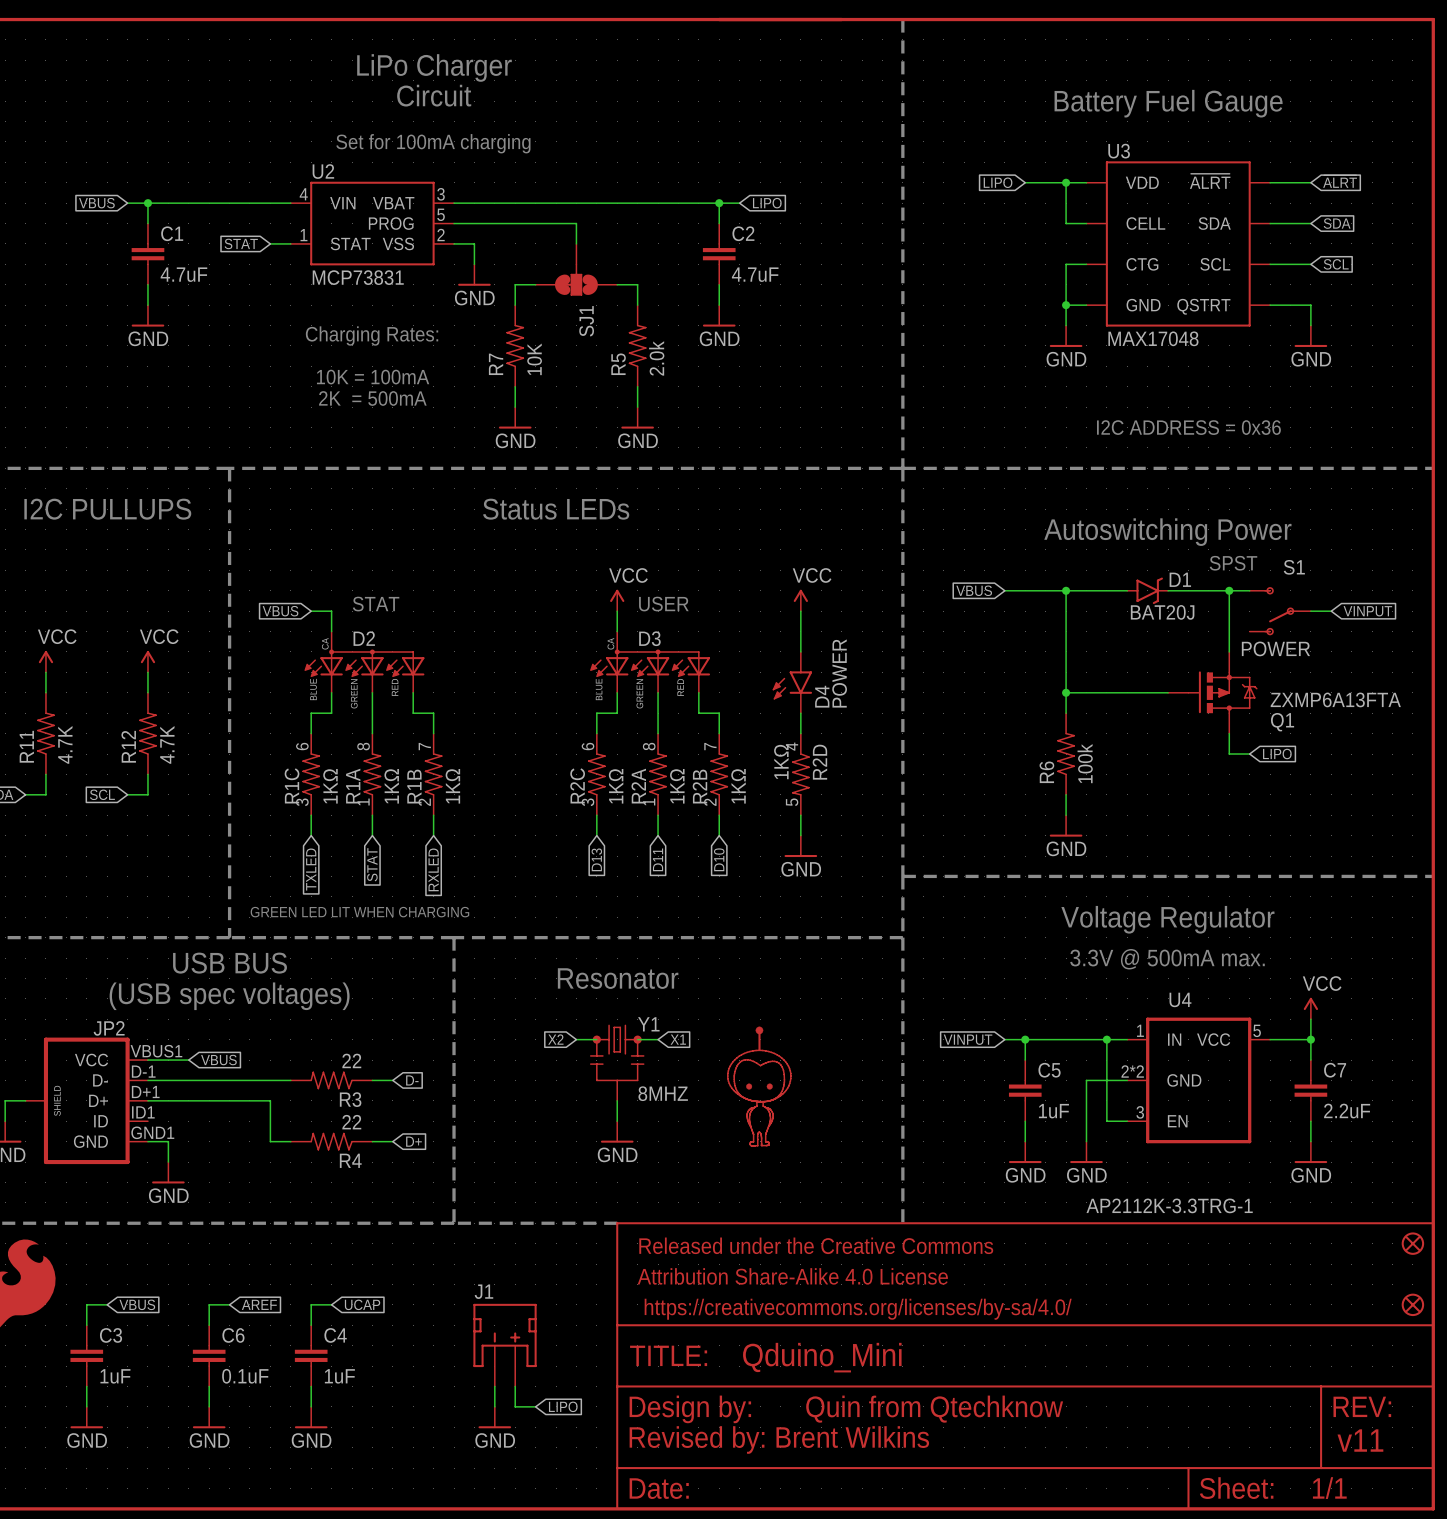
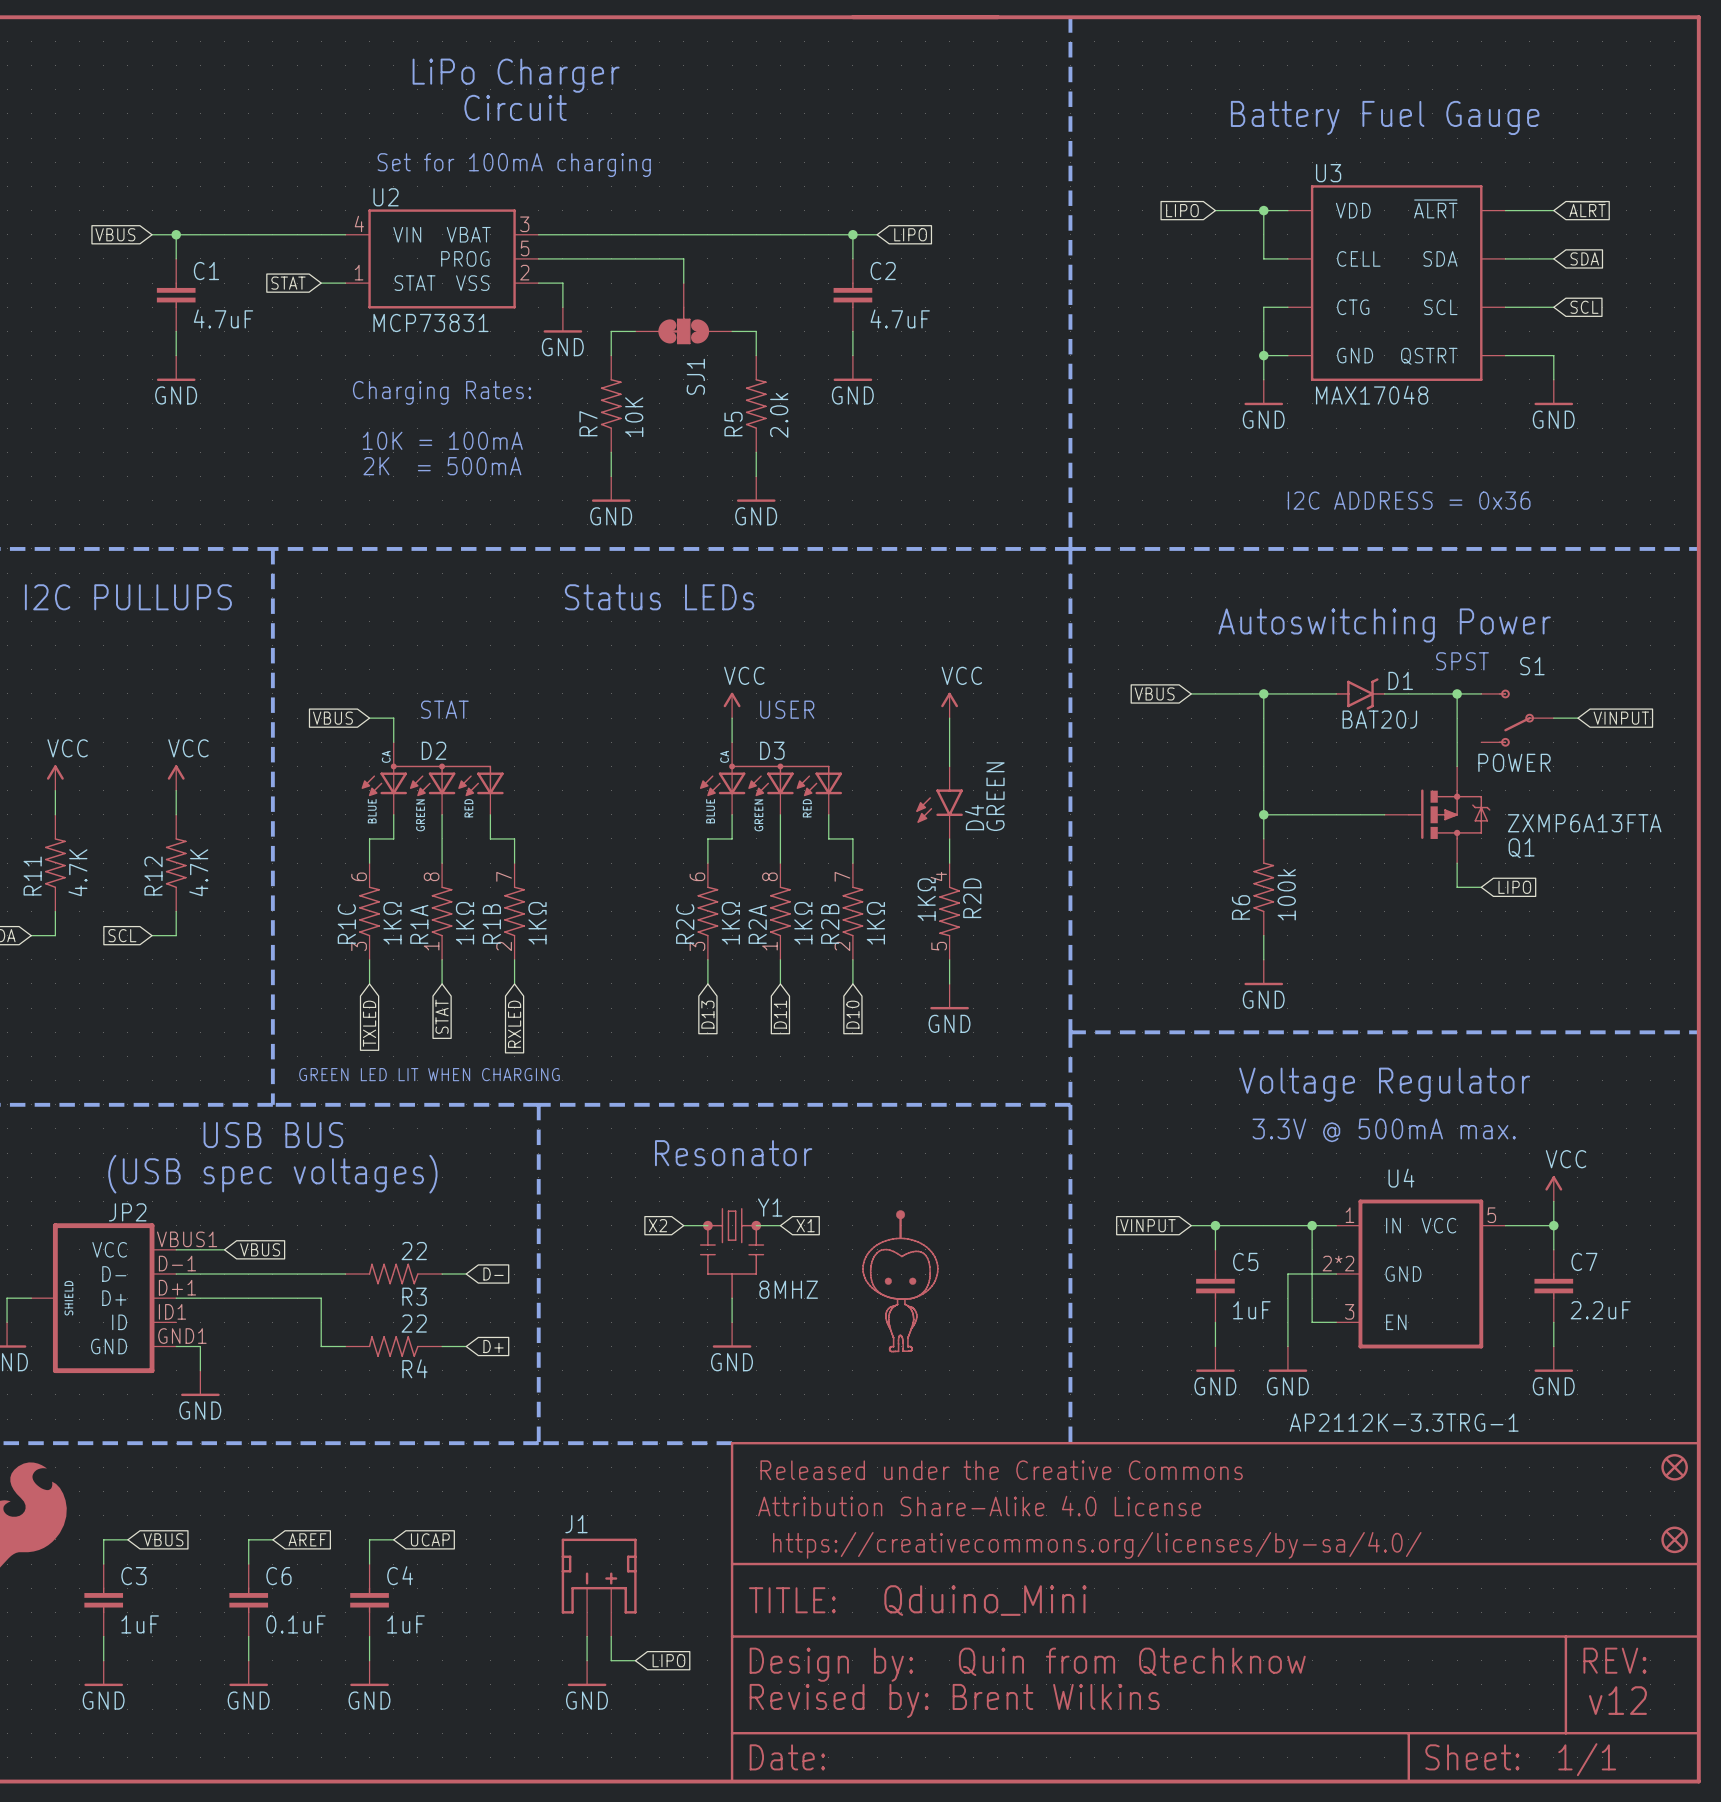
D4 value: POWER (839, 673) -> GREEN (995, 796)
text: v11 (1360, 1440) -> v12 (1617, 1700)

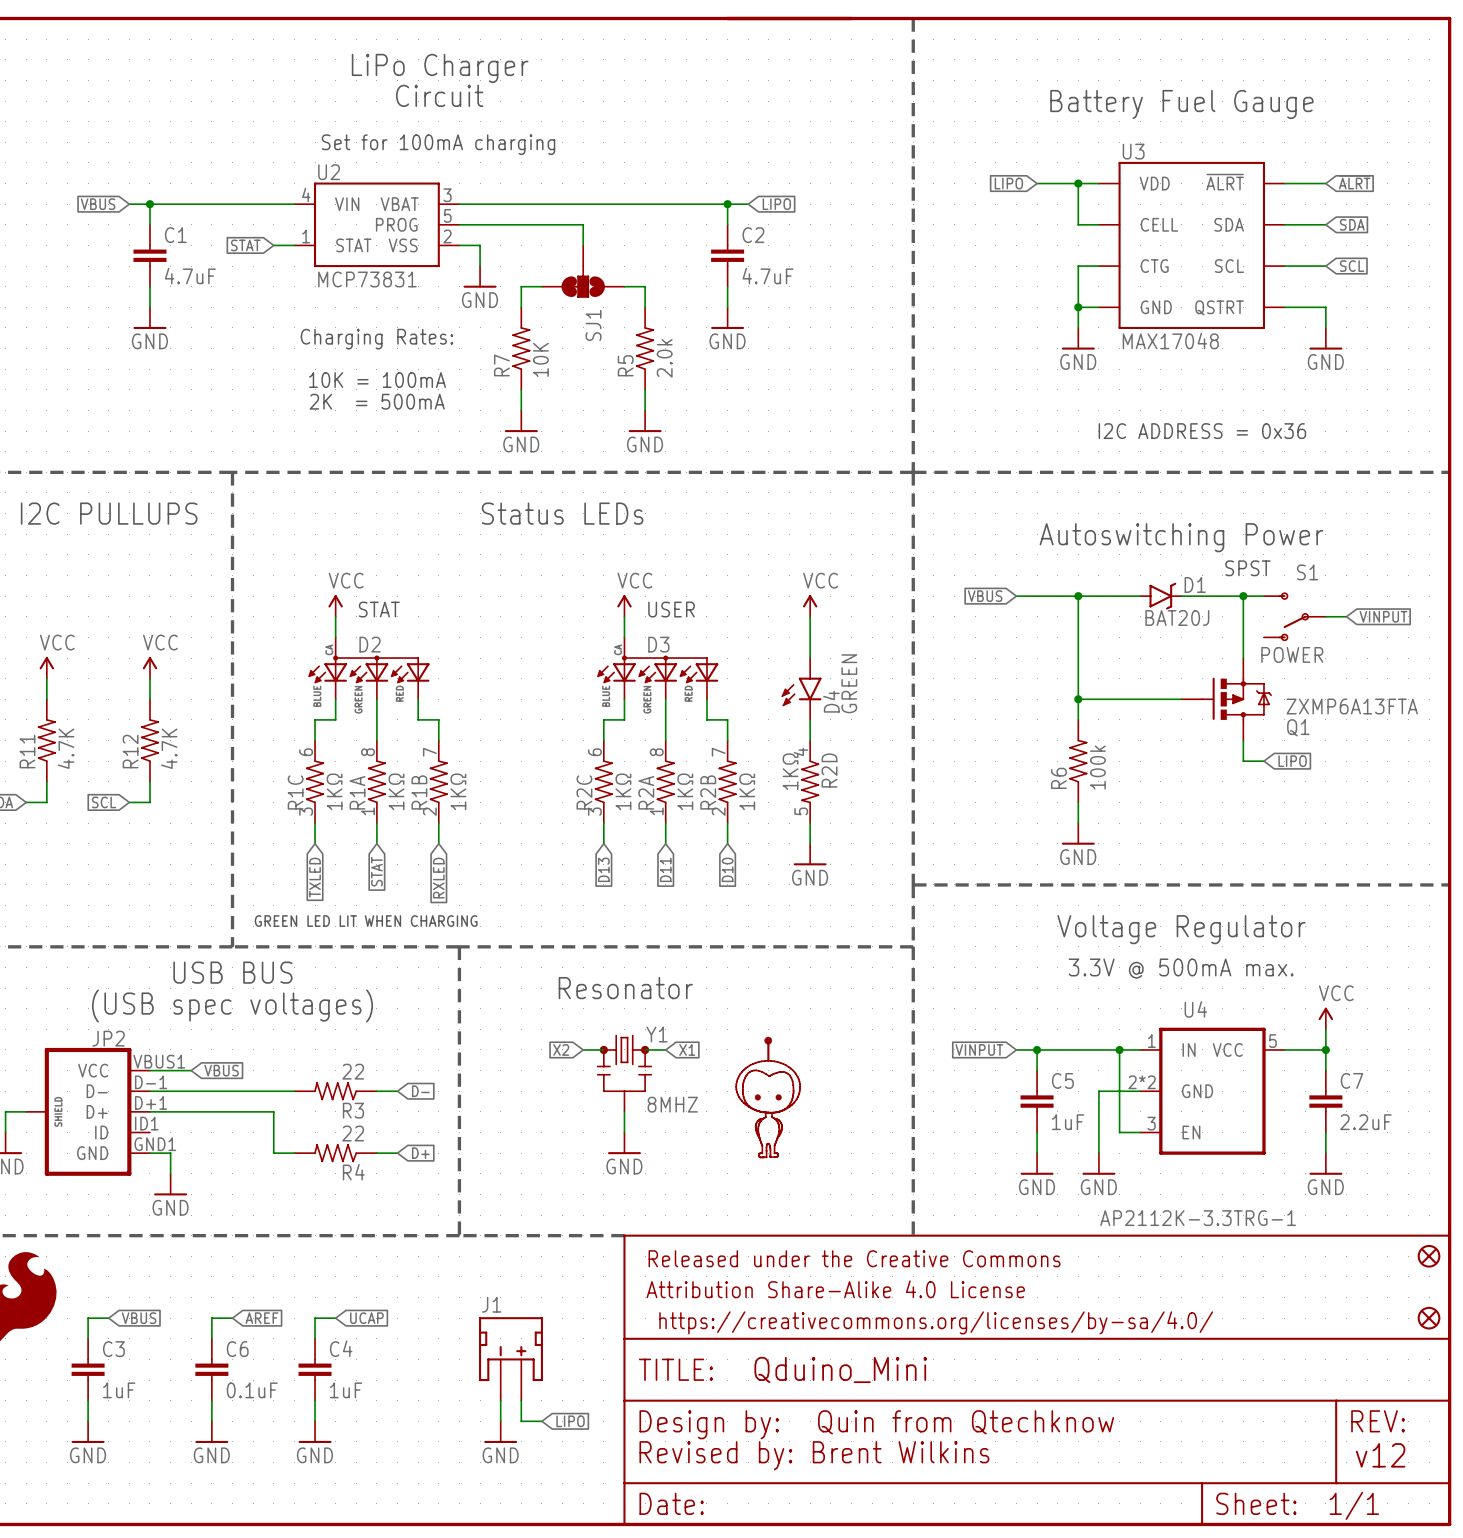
power symbol: none -> VCC (335, 605)
global label: VBUS (332, 718) -> none
wire: (369, 718) (393, 718) -> none

